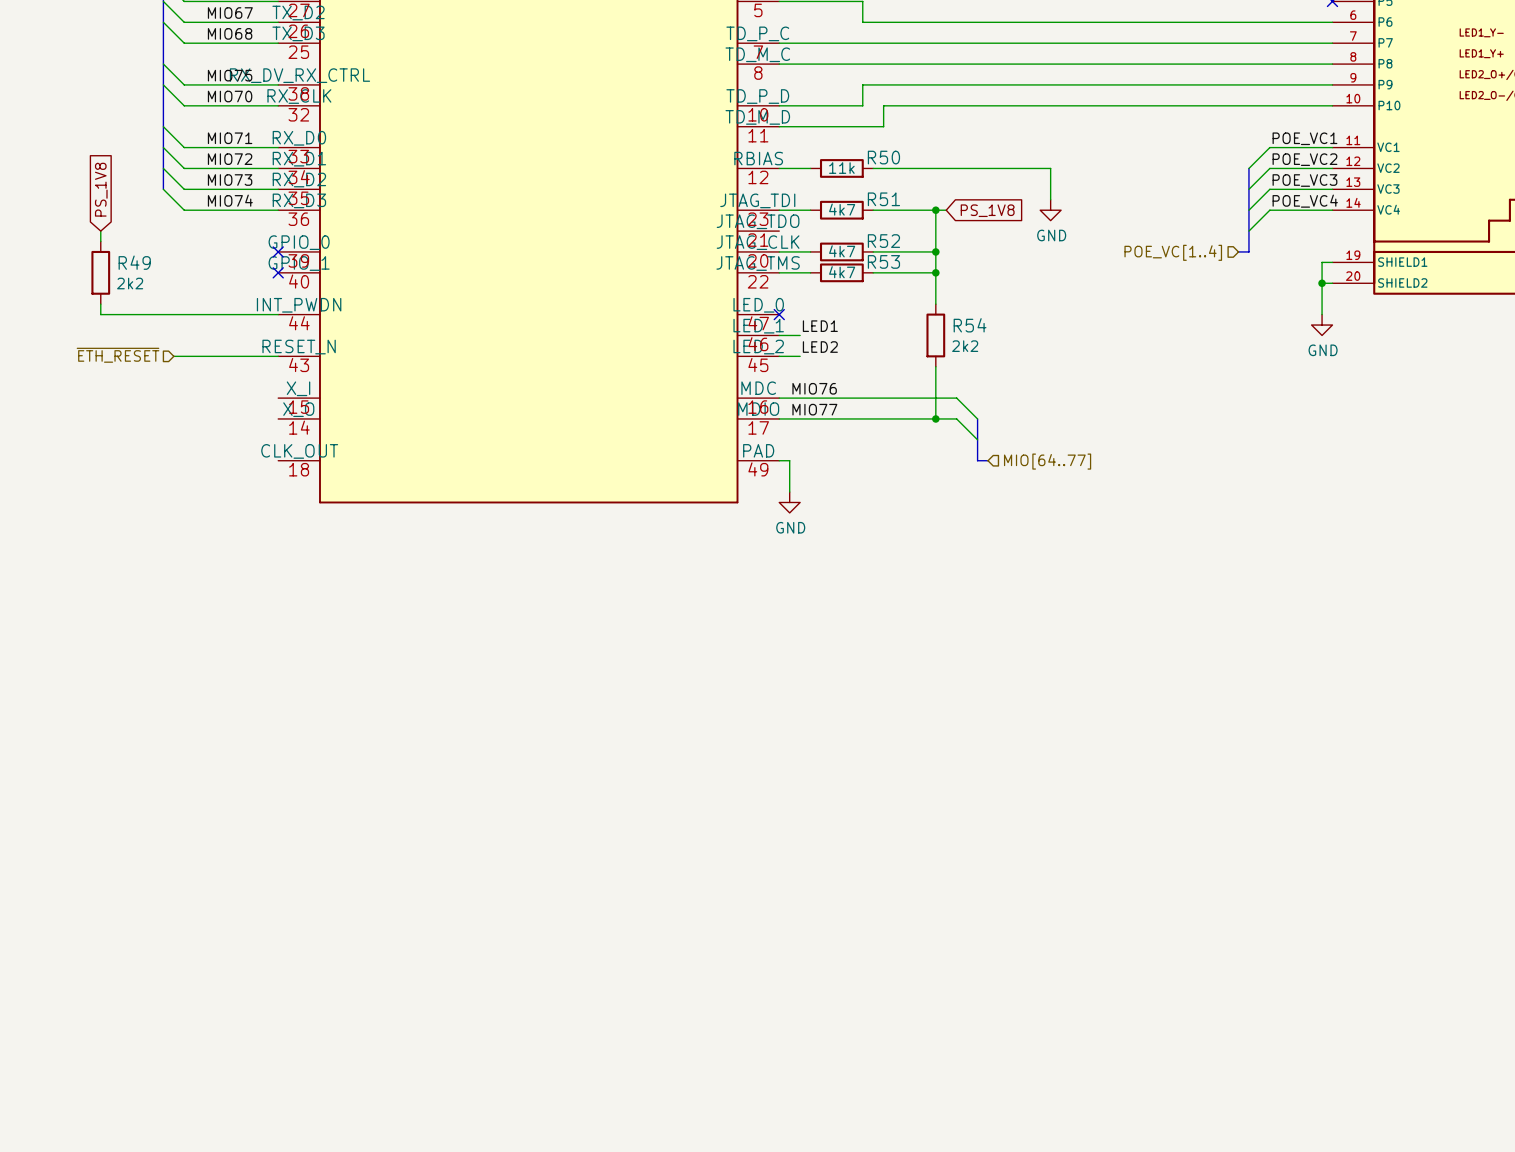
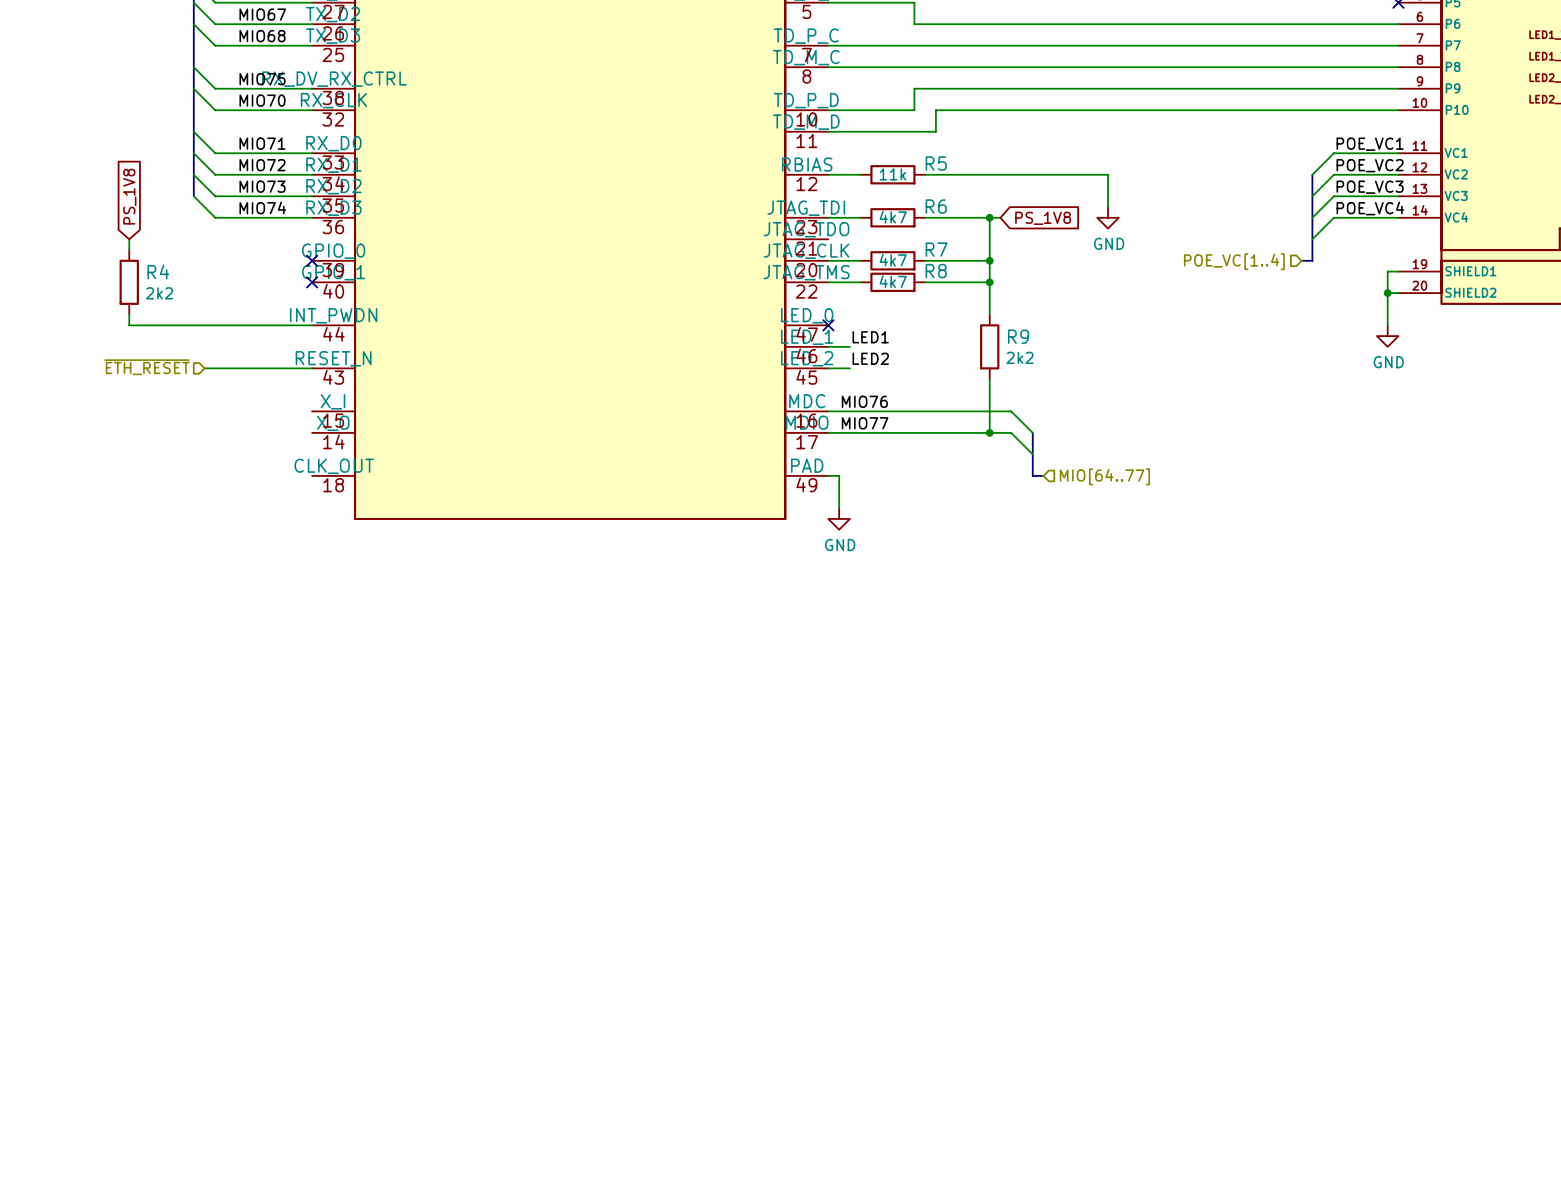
R50 name: R50 (883, 157) -> R5 (936, 163)
R51 name: R51 (883, 199) -> R6 (936, 206)
R52 name: R52 (883, 241) -> R7 (936, 249)
R53 name: R53 (883, 261) -> R8 (936, 271)
R49 name: R49 (134, 262) -> R4 (158, 271)
R54 name: R54 (970, 325) -> R9 (1018, 336)

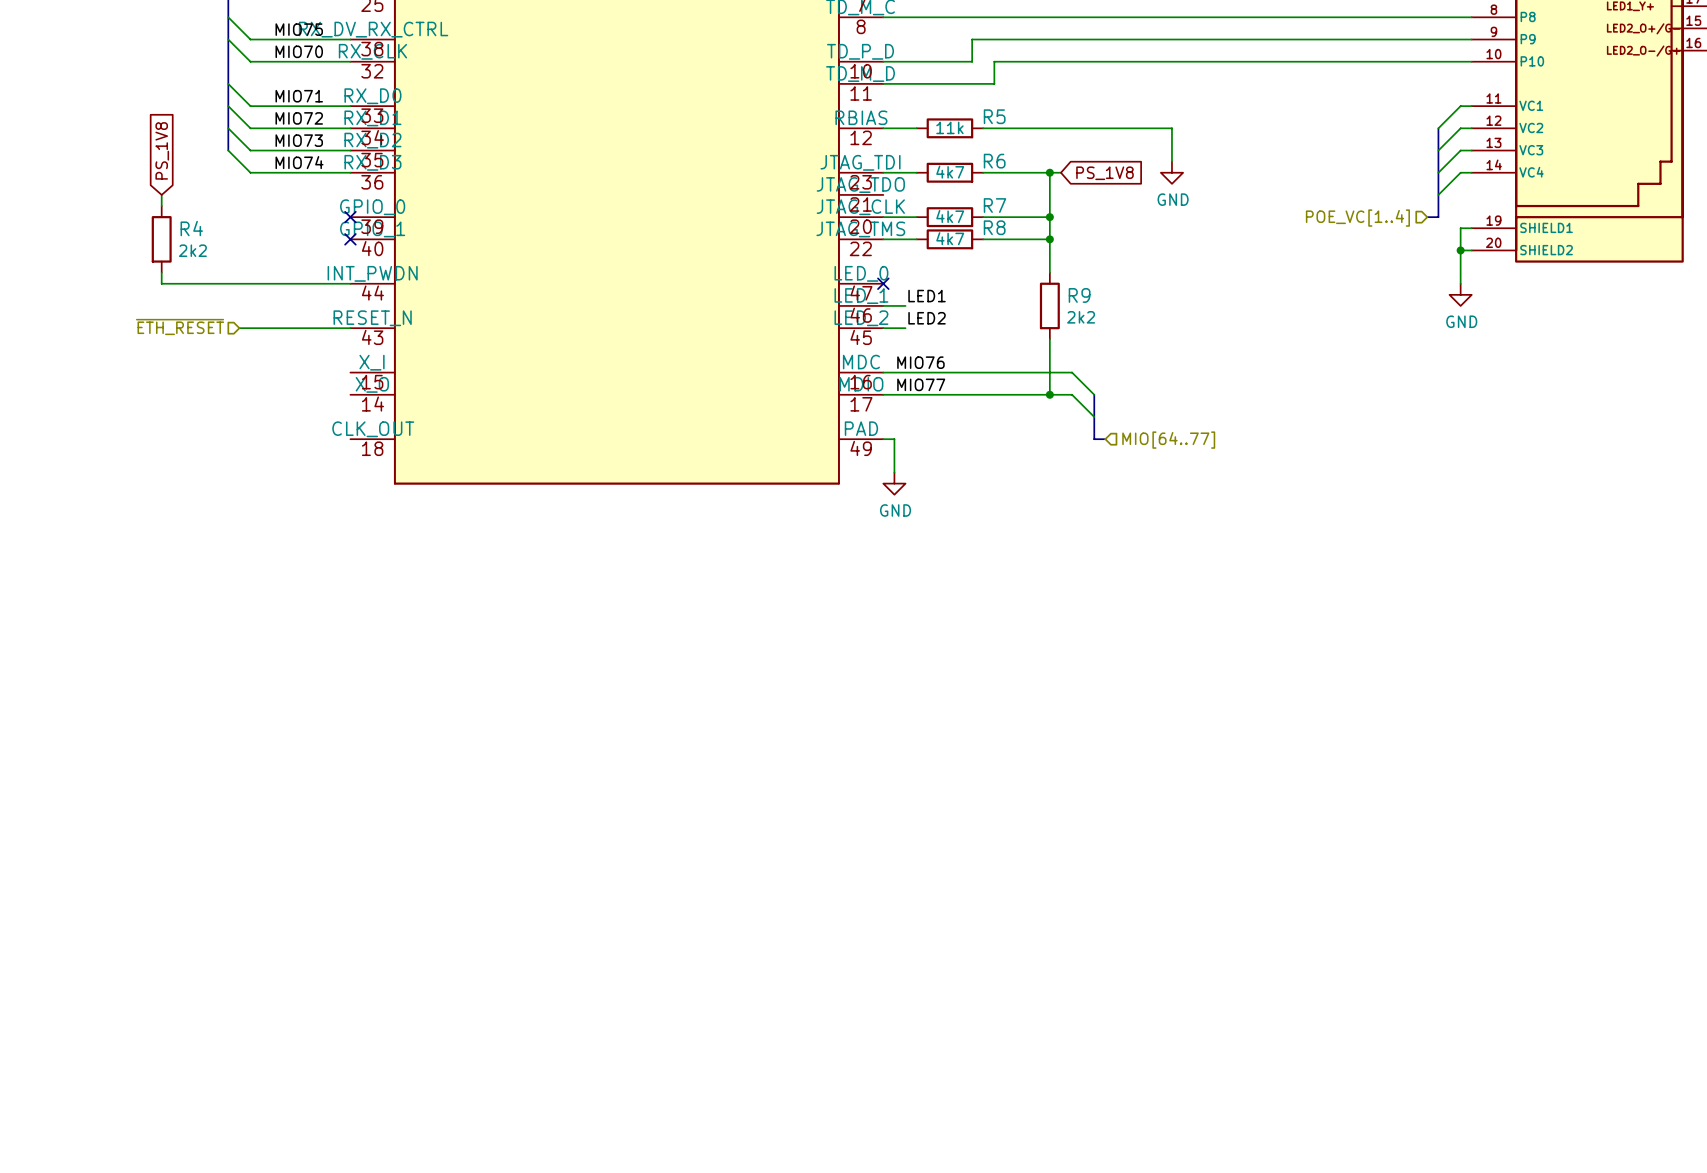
label: POE_VC1 (1370, 144) -> none
wire: (1387, 153) (1333, 153) (1312, 174) -> (1460, 106) (1438, 128)
label: POE_VC2 (1370, 165) -> none
bus: (1312, 174) (1312, 260) (1301, 260) -> (1438, 128) (1438, 217) (1427, 217)
wire: (1387, 174) (1333, 174) (1312, 196) -> (1460, 128) (1438, 150)
label: POE_VC3 (1370, 187) -> none
wire: (1387, 196) (1333, 196) (1312, 217) -> (1460, 150) (1438, 172)
label: POE_VC4 (1370, 208) -> none
wire: (1387, 217) (1333, 217) (1312, 239) -> (1460, 172) (1438, 194)
hierarchical label position: POE_VC[1..4] (1234, 261) -> POE_VC[1..4] (1357, 218)

